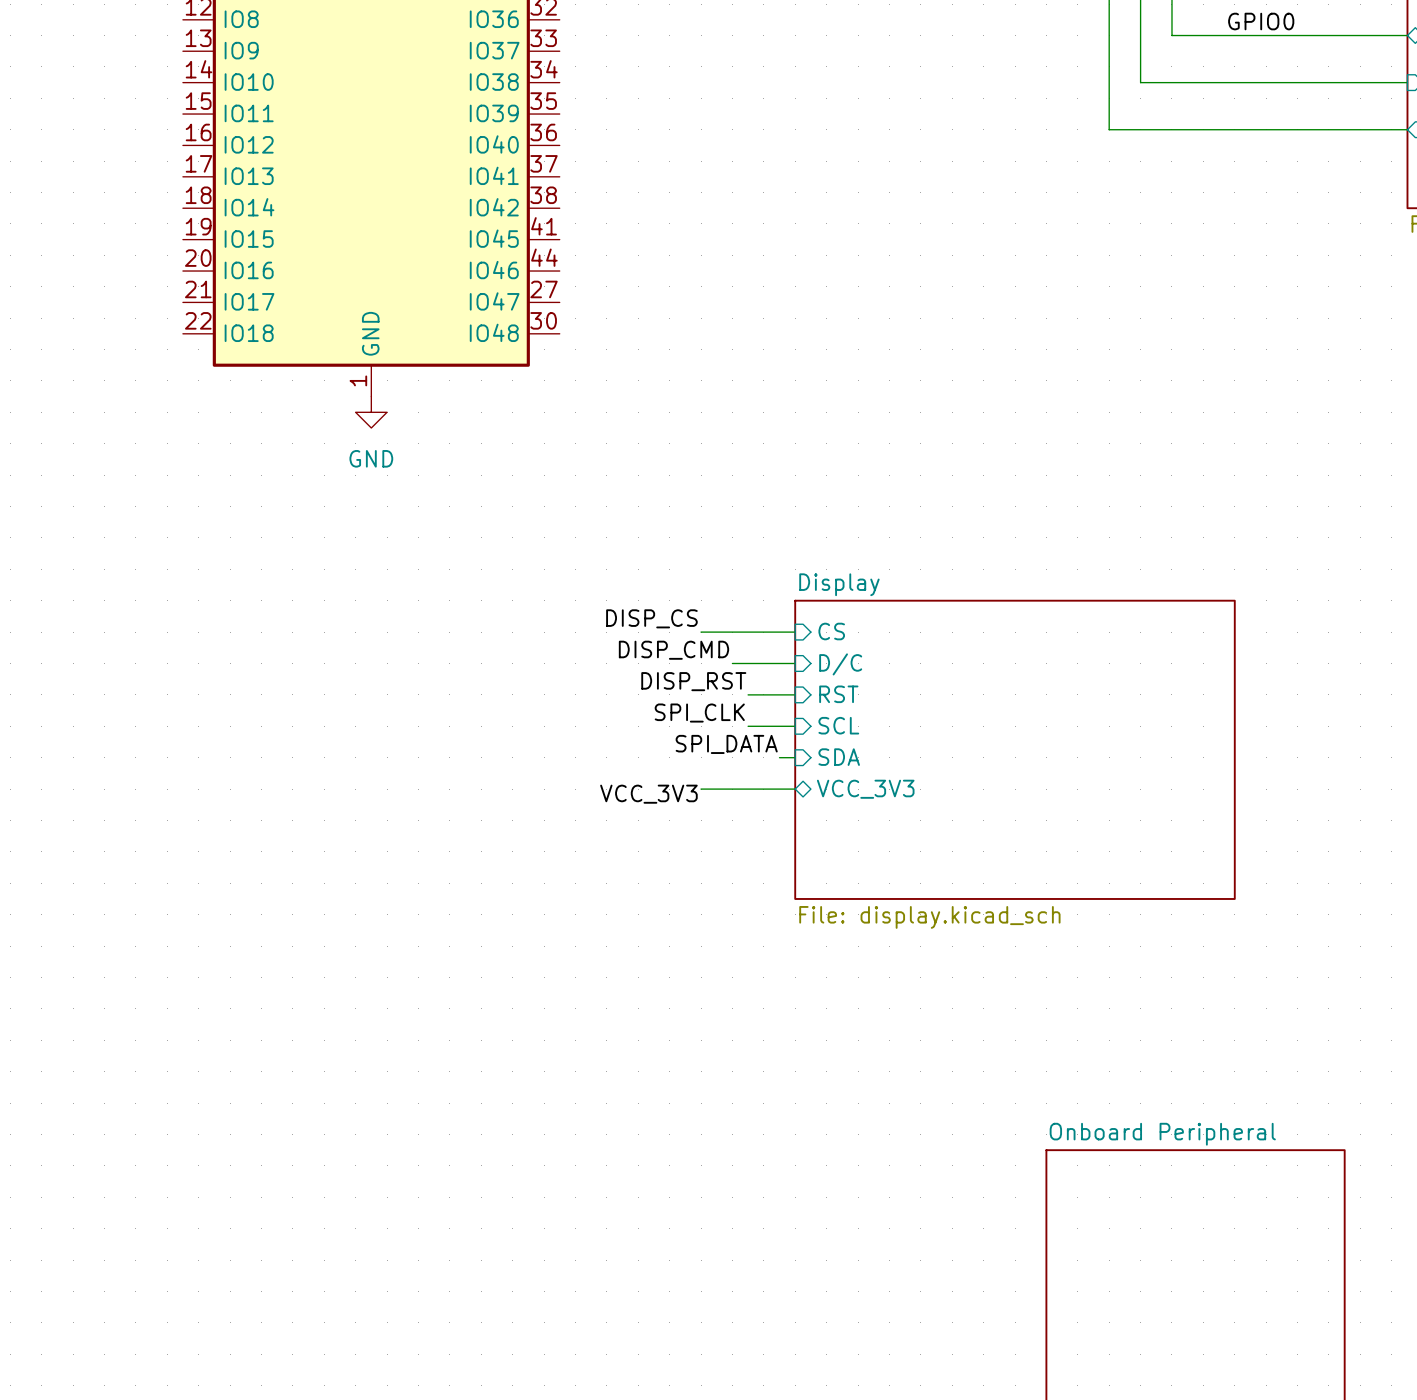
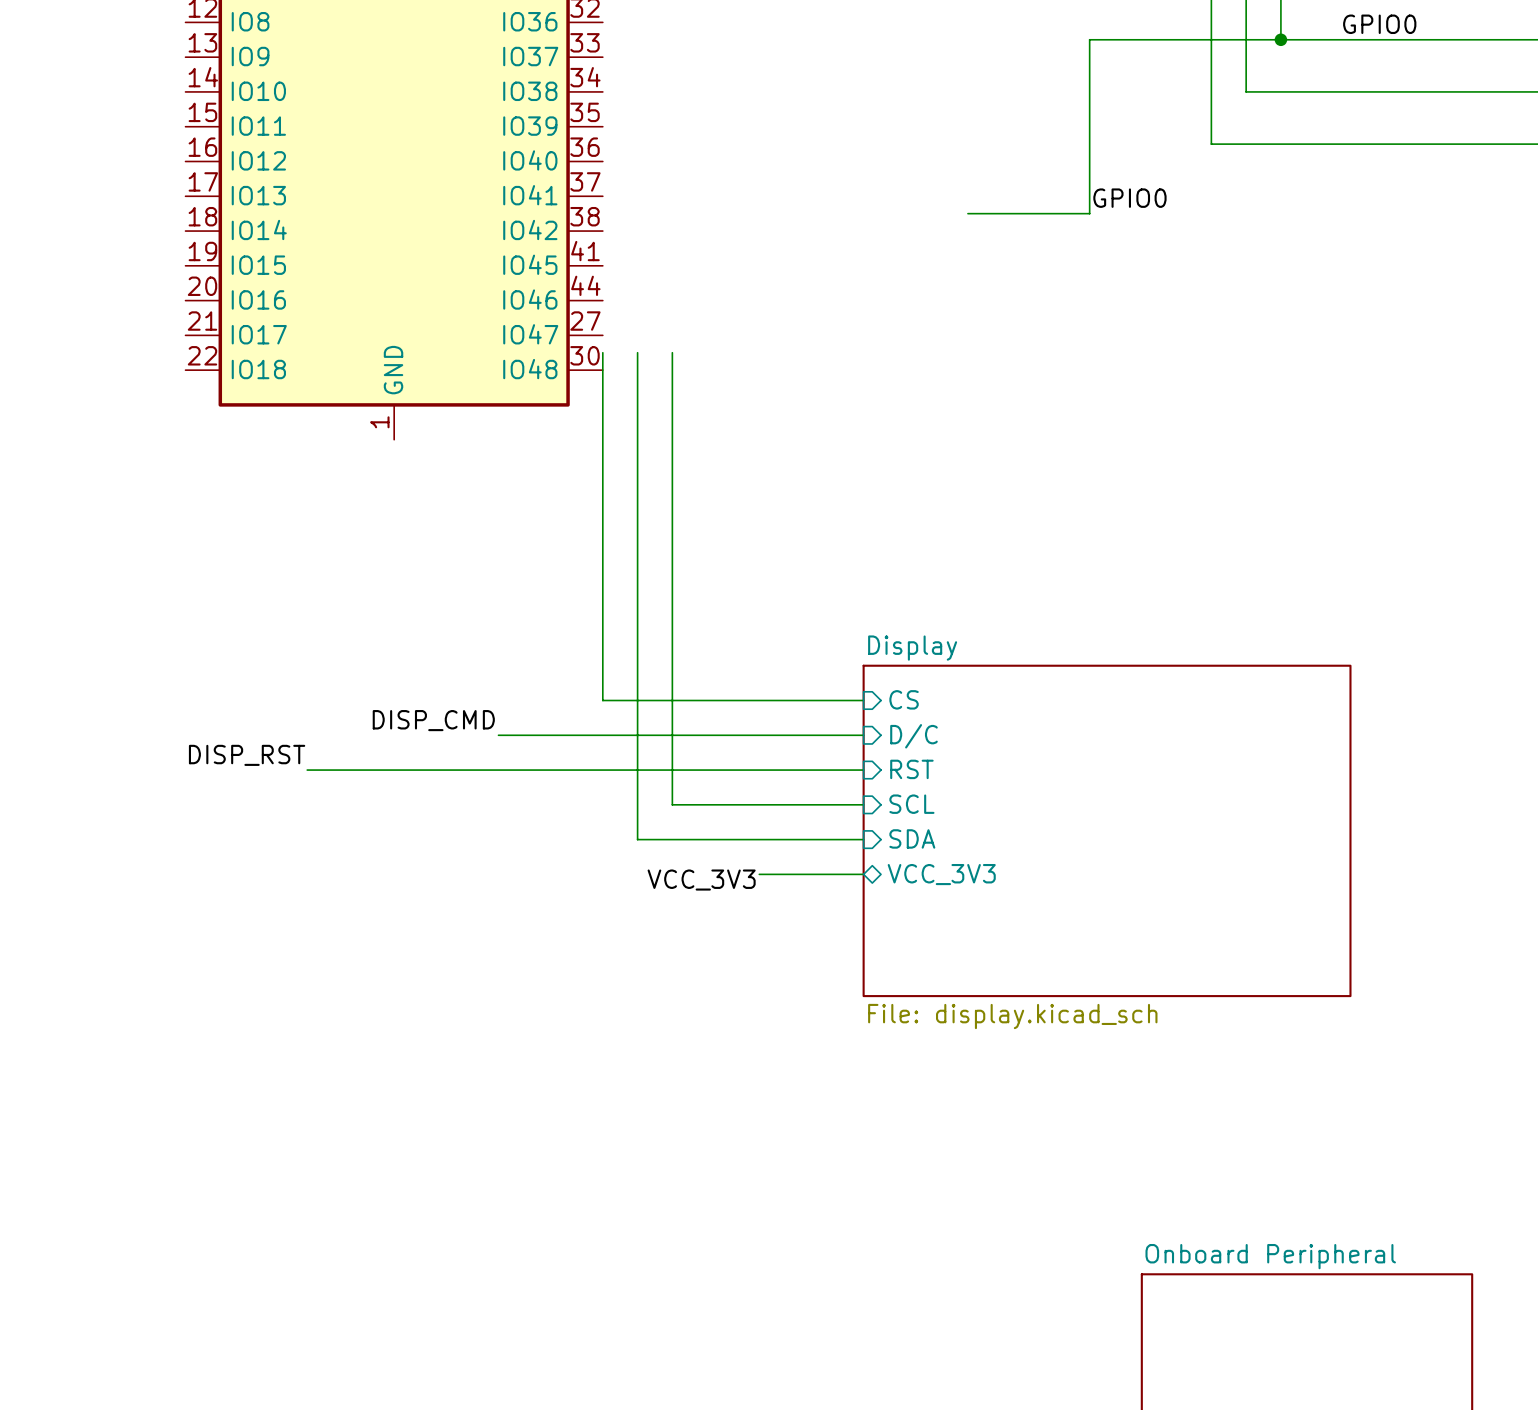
wire: none -> (1280, 39) (1089, 39) (1089, 213) (967, 213)
junction: none -> (1280, 39)
label: none -> GPIO0 (1129, 198)
wire: none -> (602, 352) (602, 700) (759, 700)
wire: none -> (637, 352) (637, 839) (846, 839)
wire: none -> (672, 352) (672, 804) (811, 804)
power symbol: GND (371, 412) -> none
label: DISP_CS (651, 618) -> none
label position: DISP_CMD (673, 650) -> DISP_CMD (433, 720)
wire: none -> (498, 735) (794, 735)
label: none -> DISP_RST (247, 755)
label: DISP_RST (693, 681) -> none
wire: none -> (307, 770) (811, 770)
label: SPI_CLK (699, 713) -> none
label: SPI_DATA (726, 744) -> none

